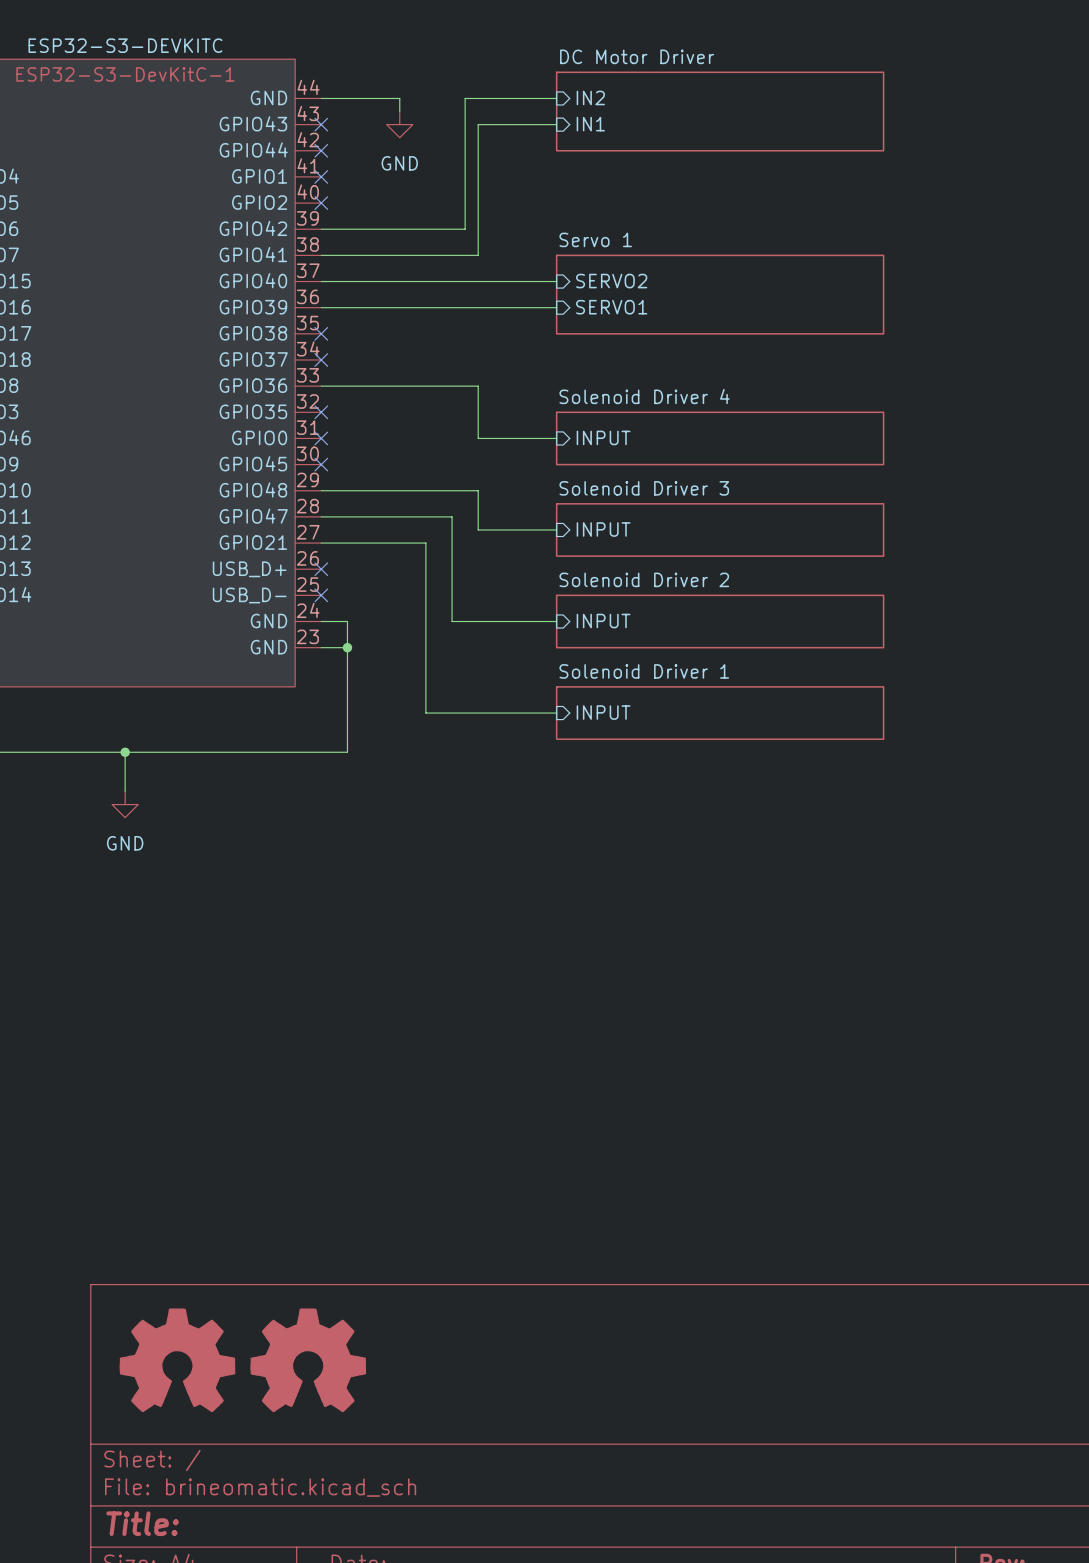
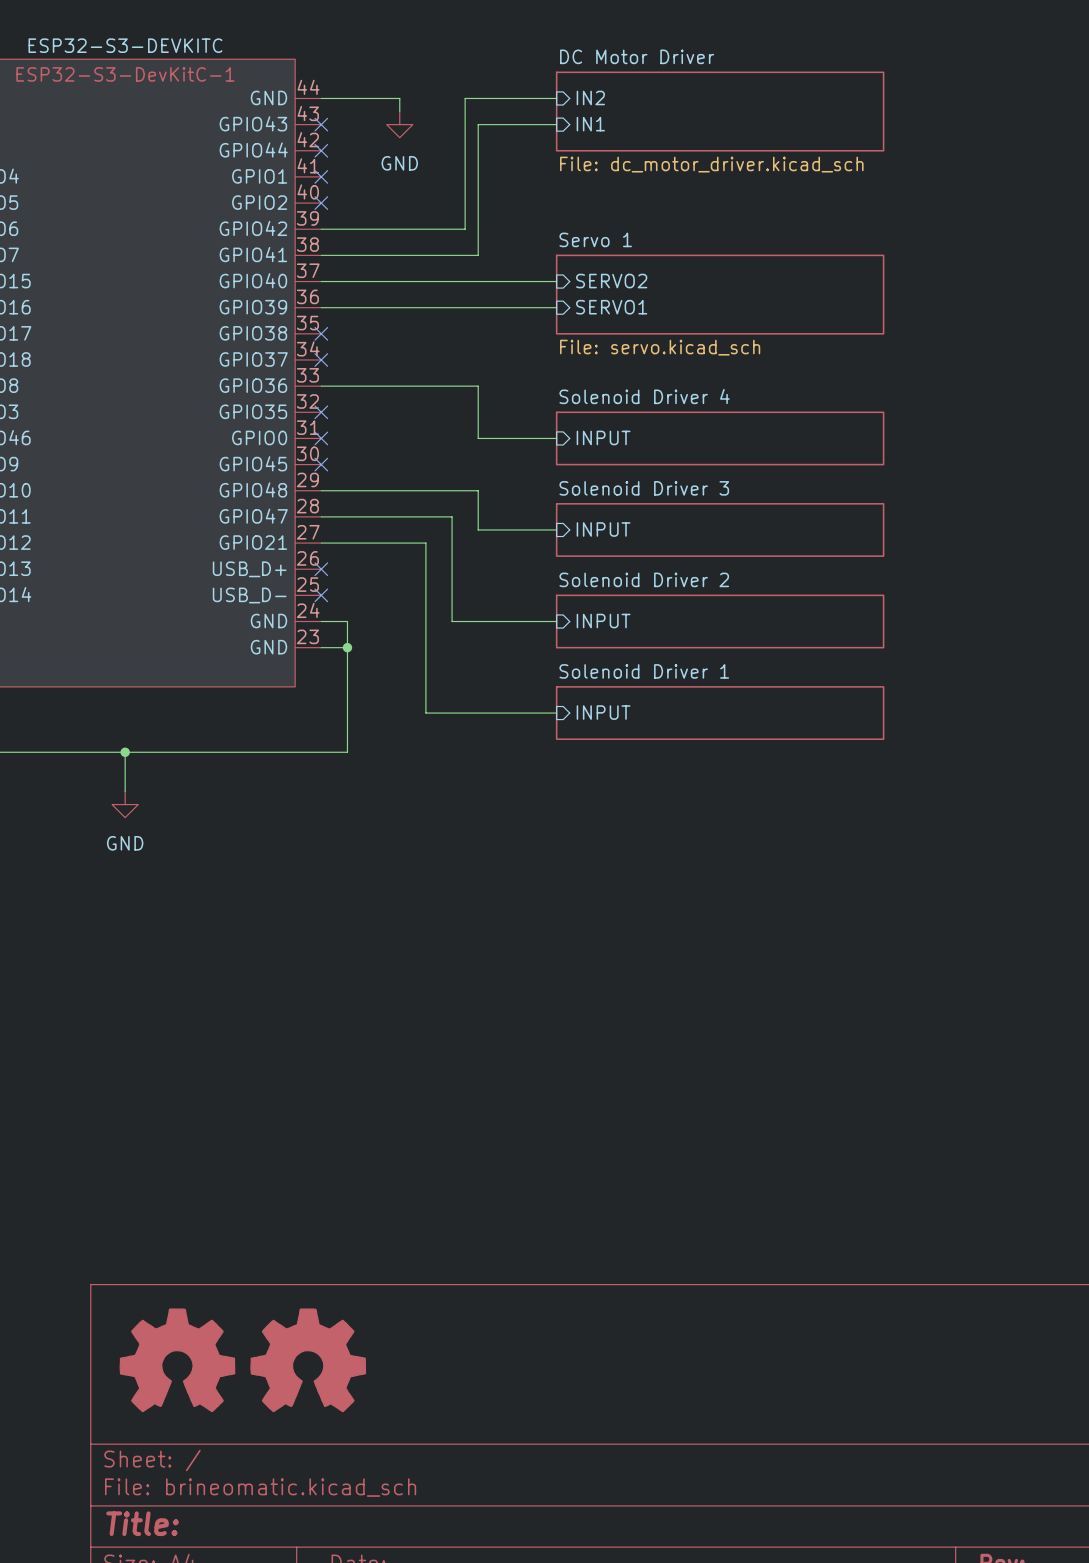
sheet DC Motor Driver value: none -> File: dc_motor_driver.kicad_sch (711, 164)
sheet Servo 1 value: none -> File: servo.kicad_sch (660, 347)

